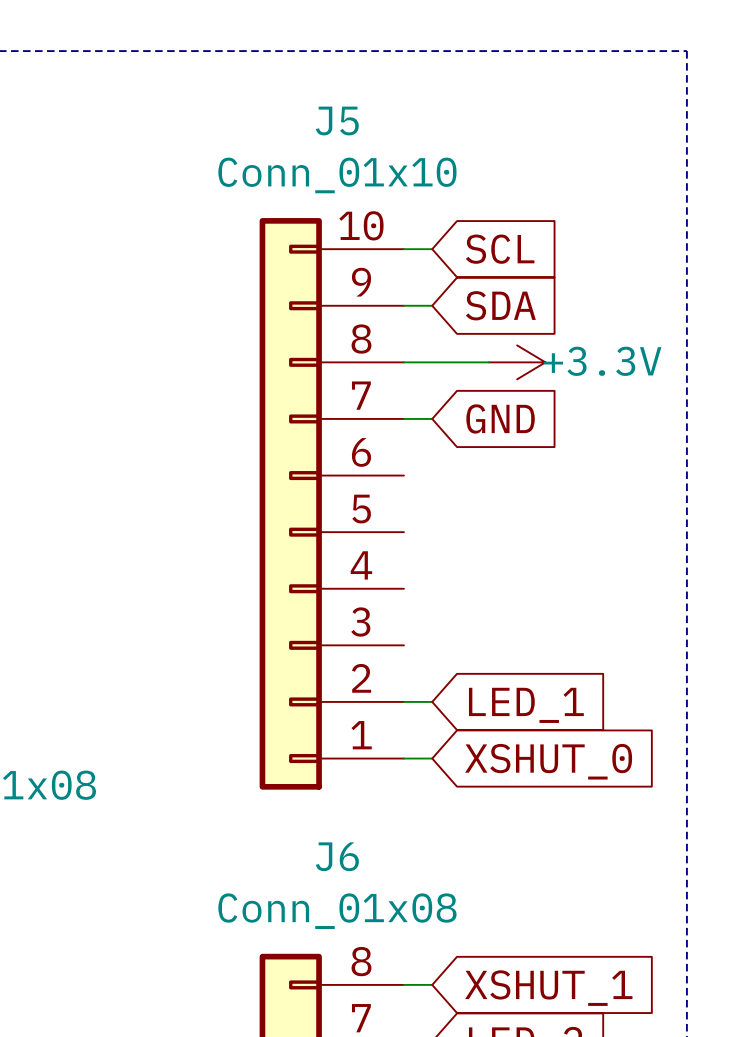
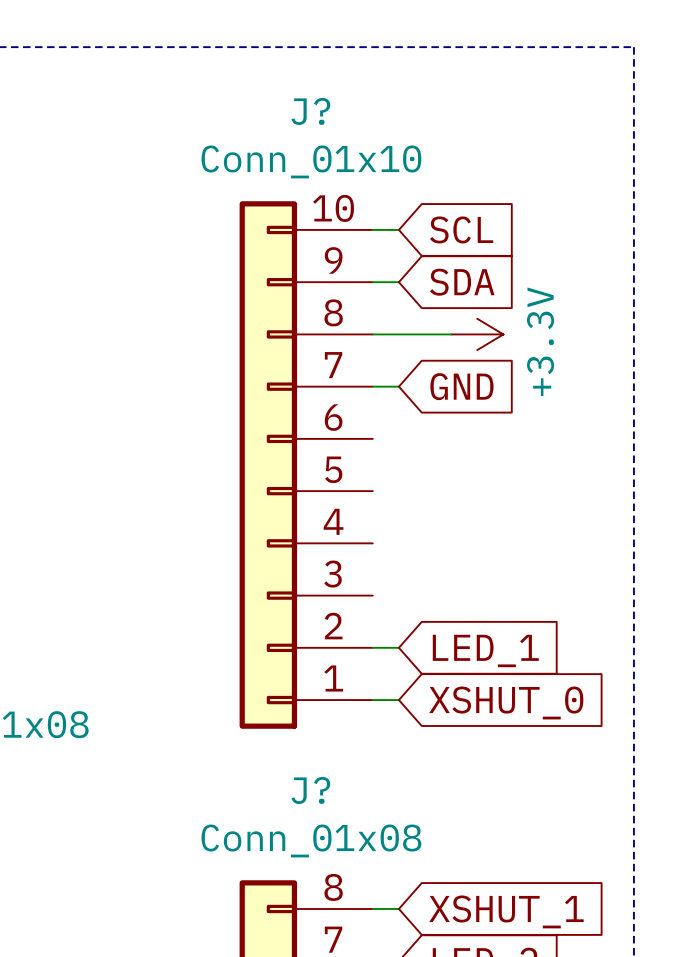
J5 name: J5 (337, 121) -> J? (310, 111)
power symbol text rotation: 0° (602, 361) -> 90° counterclockwise (540, 341)
J6 name: J6 (337, 856) -> J? (310, 790)

